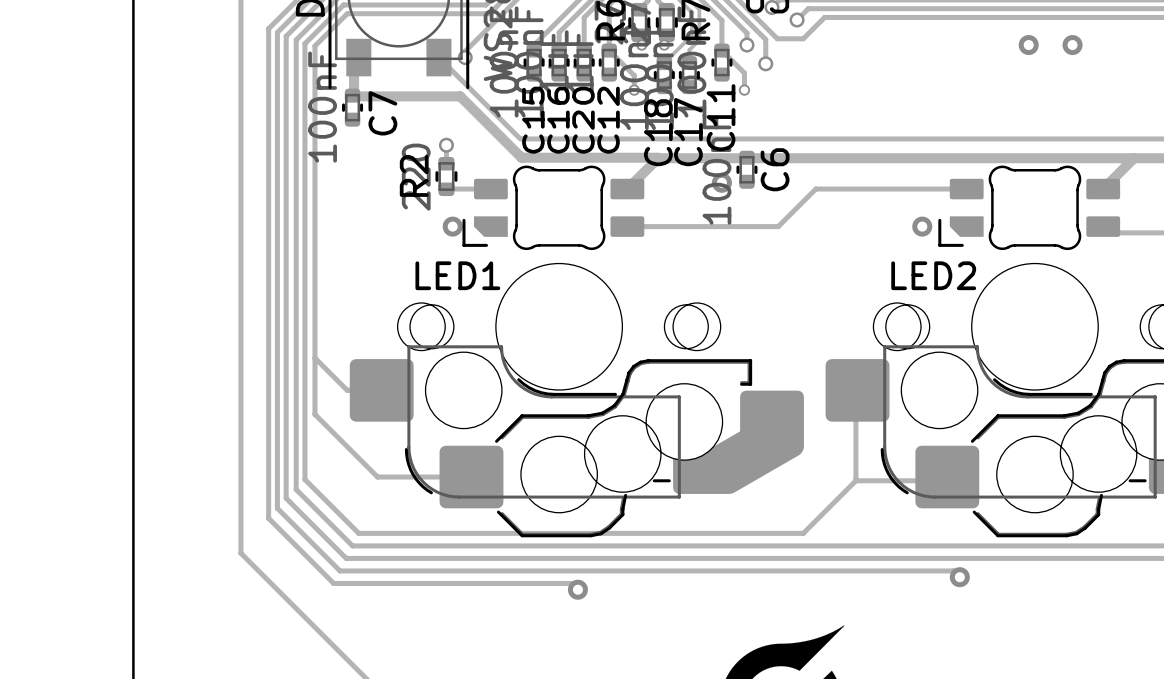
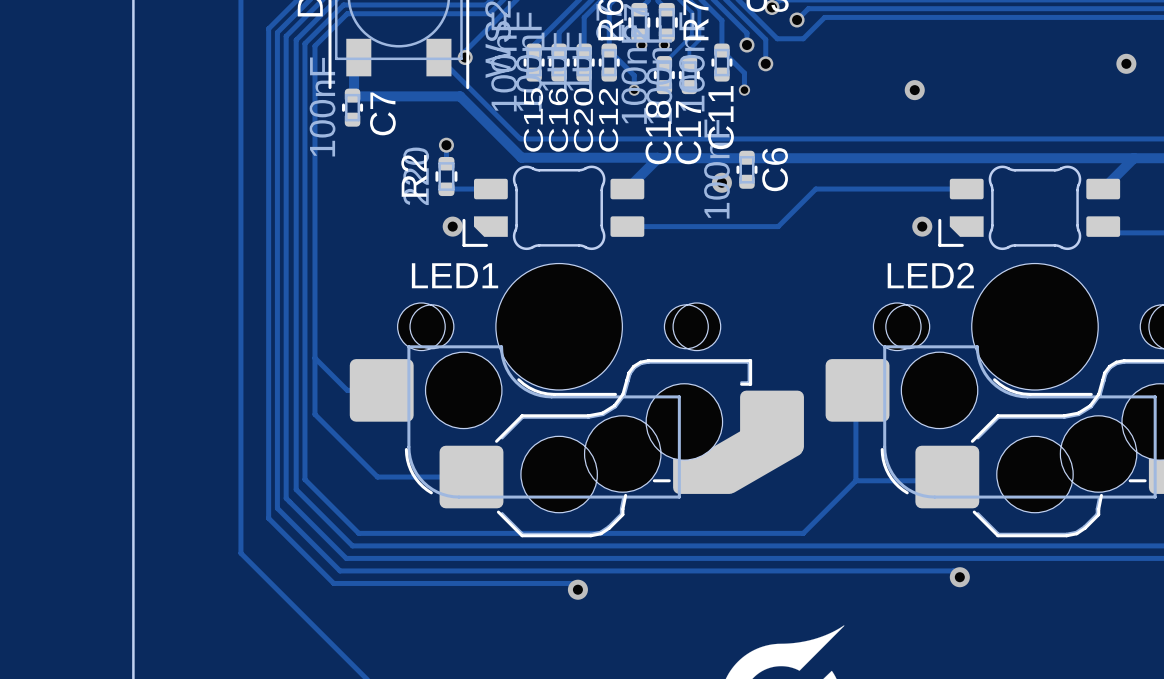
via: (1028, 45) -> none
via: (1072, 45) -> none
via: none -> (1126, 63)
via: none -> (914, 90)

